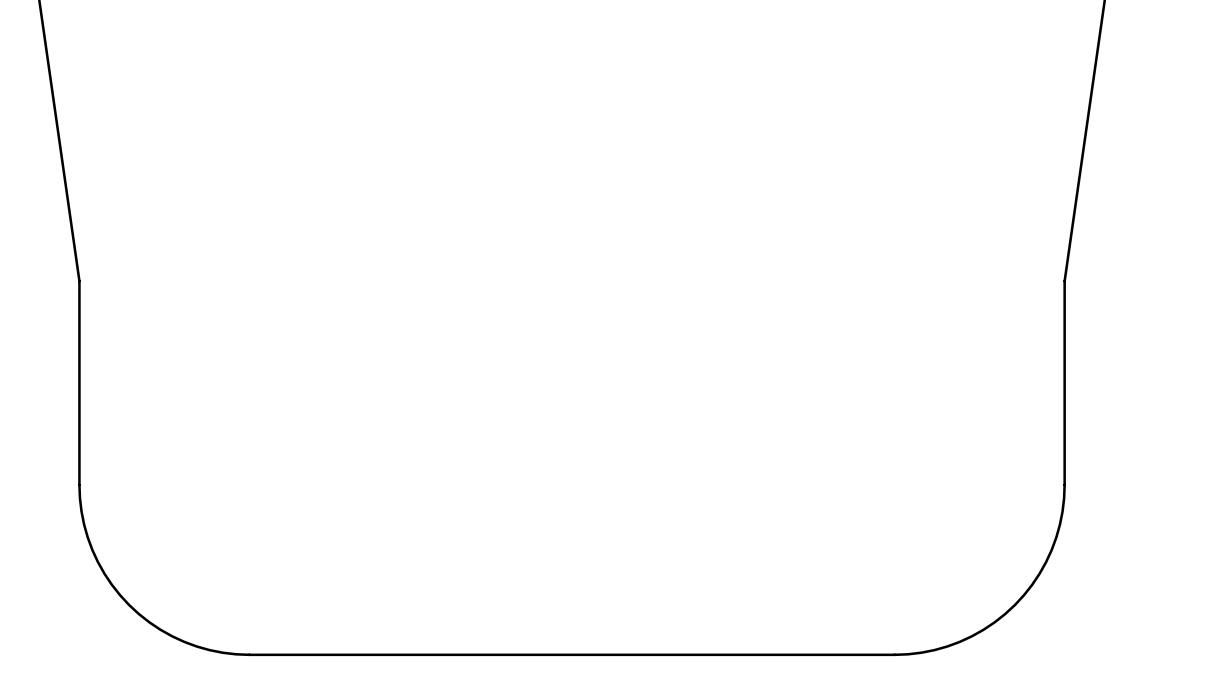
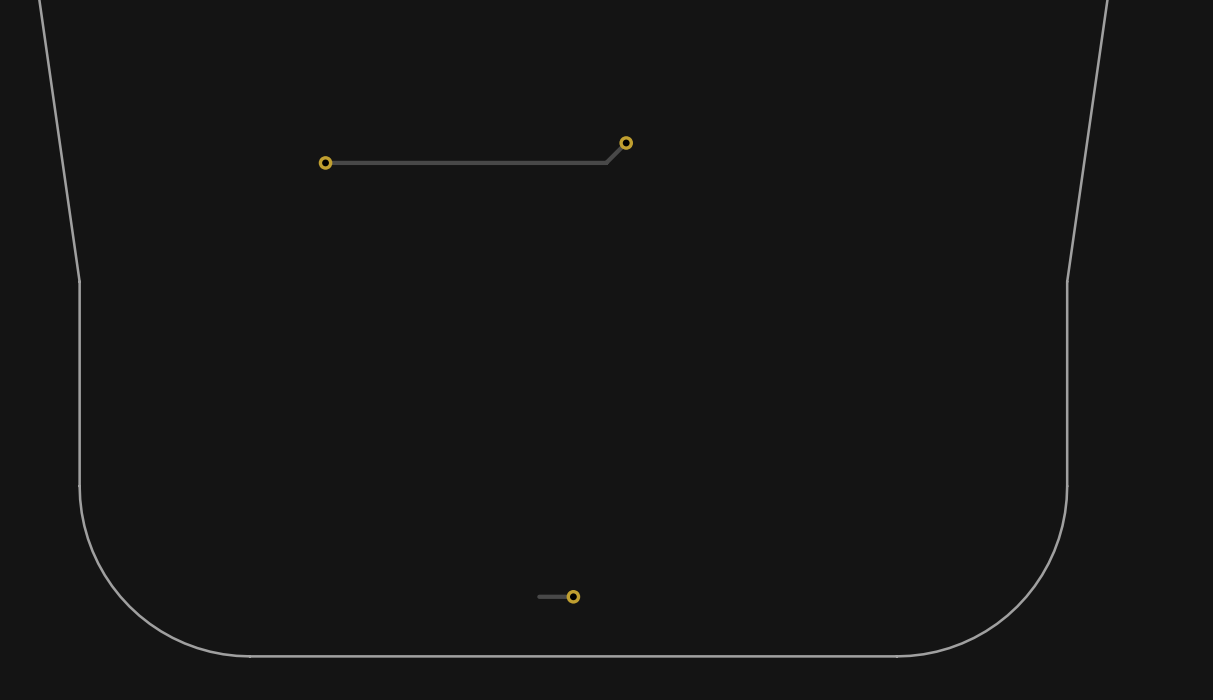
track: none -> (626, 142) (606, 162) (325, 162)
via: none -> (626, 142)
via: none -> (325, 162)
track: none -> (573, 596) (539, 596)
via: none -> (573, 596)

